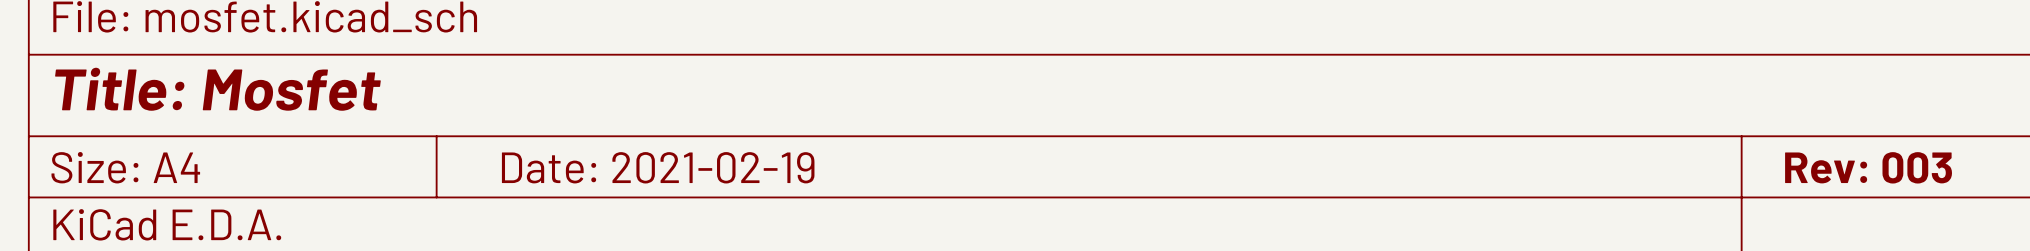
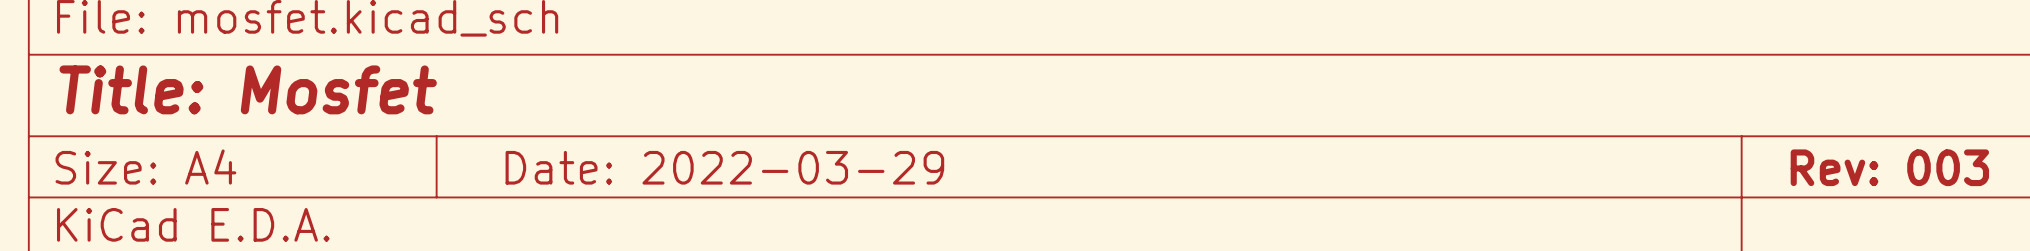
title block: Date: 2021-02-19 (658, 167) -> Date: 2022-03-29 (724, 167)

